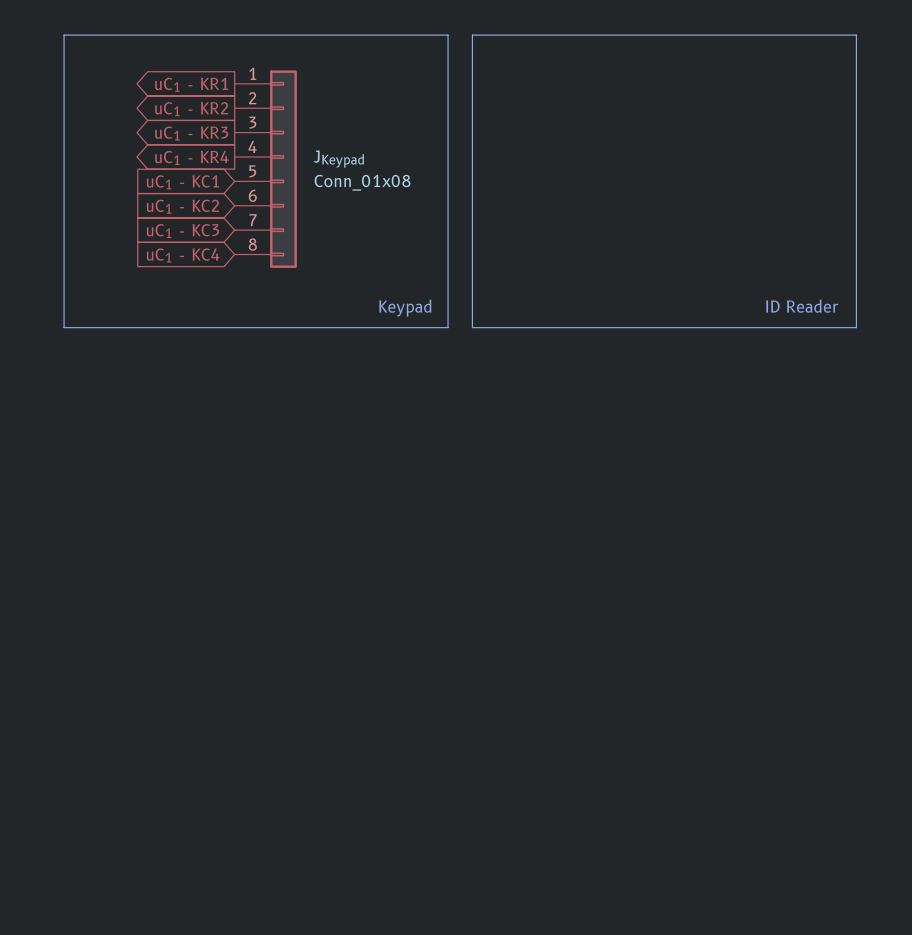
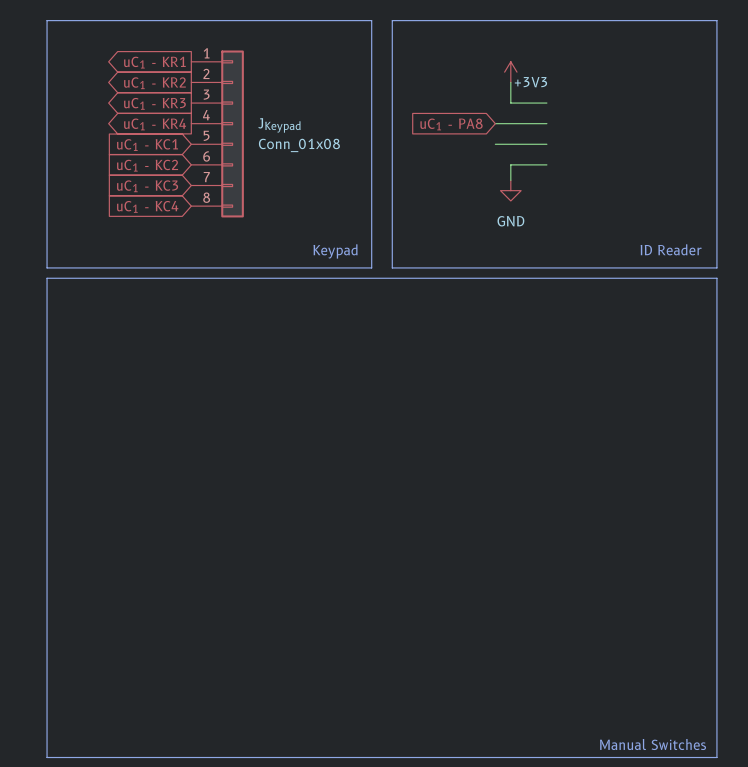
power symbol: none -> +3V3 (510, 72)
wire: none -> (510, 82) (510, 103) (546, 103)
wire: none -> (495, 123) (546, 123)
global label: none -> uC1 - PA8 (451, 124)
wire: none -> (495, 144) (546, 144)
wire: none -> (546, 164) (510, 164) (510, 180)
power symbol: none -> GND (510, 190)
line: none -> (47, 278) (47, 757) (716, 757) (716, 278) (47, 278)
text: none -> Manual Switches (652, 744)

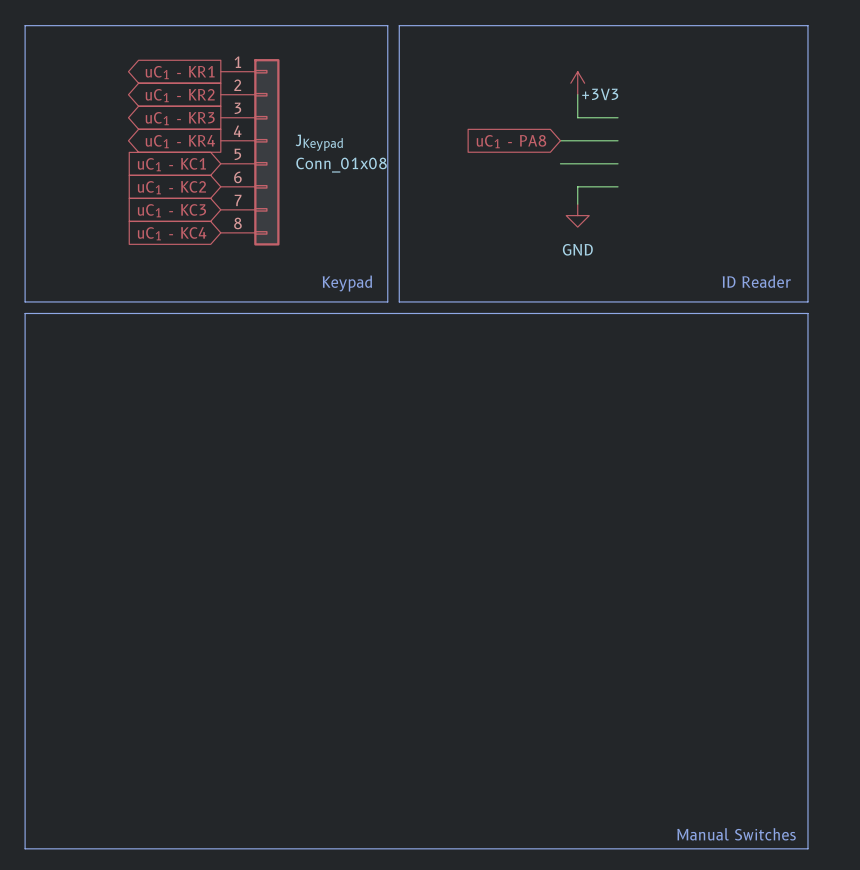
line: (47, 20) (47, 267) -> (59, 25) (25, 25) (25, 301) (59, 301)
line: (340, 20) (351, 20) -> (387, 25) (387, 301)
line: (371, 20) (371, 267) -> (422, 25) (445, 25)
line: (392, 20) (392, 267) -> (422, 301) (445, 301)
text position: Keypad (335, 251) -> Keypad (347, 283)
line: (340, 267) (351, 267) -> (399, 25) (399, 301)
line: (47, 278) (47, 757) -> (59, 313) (25, 313) (25, 848) (59, 848)

